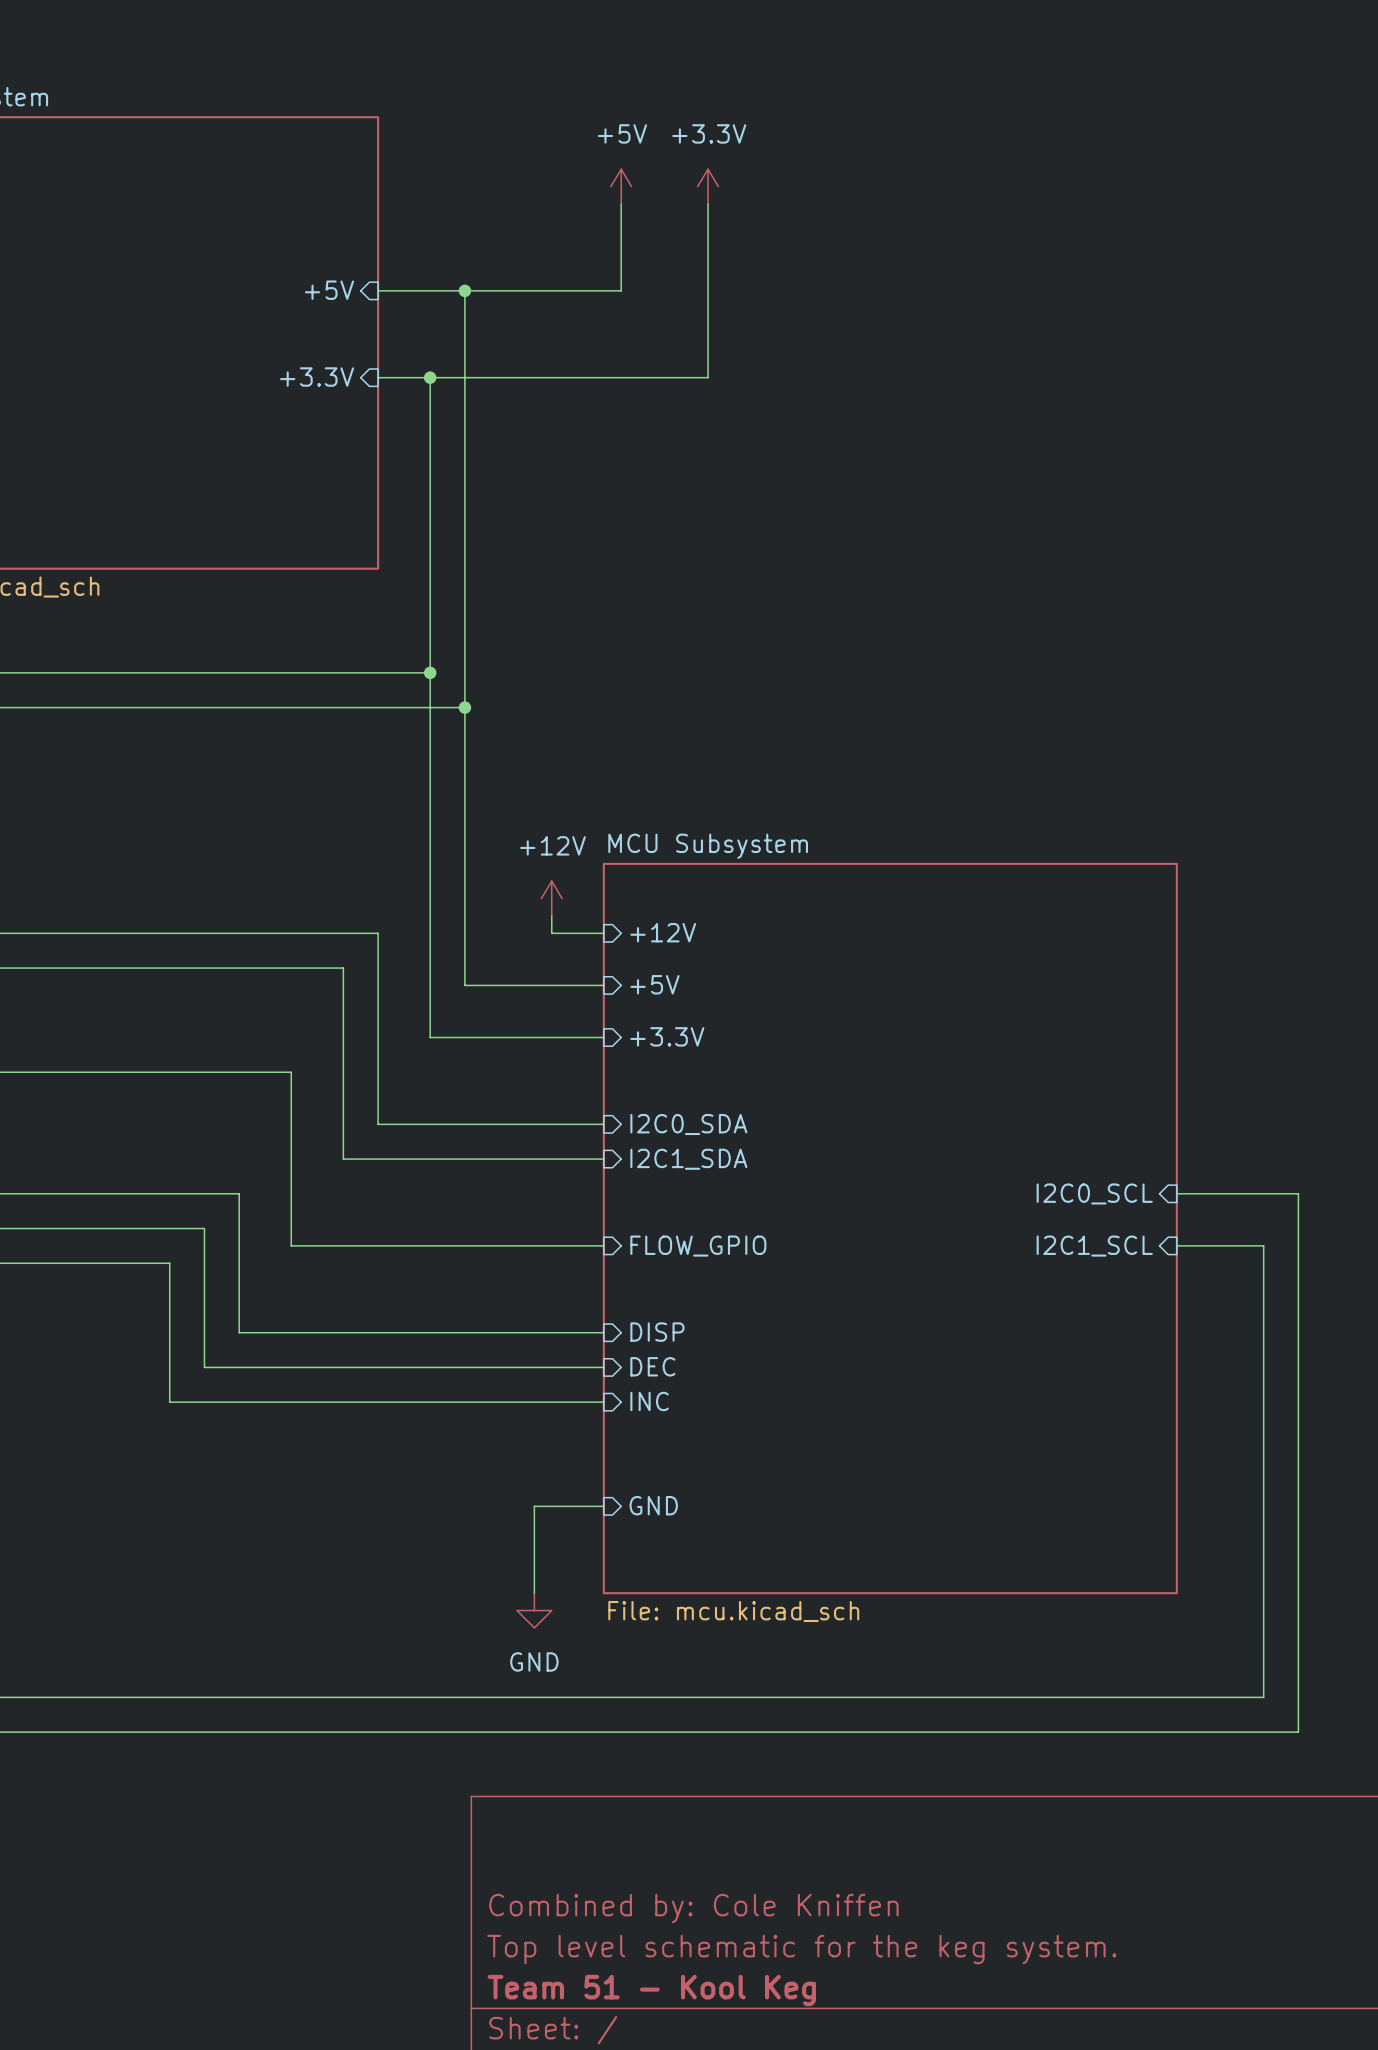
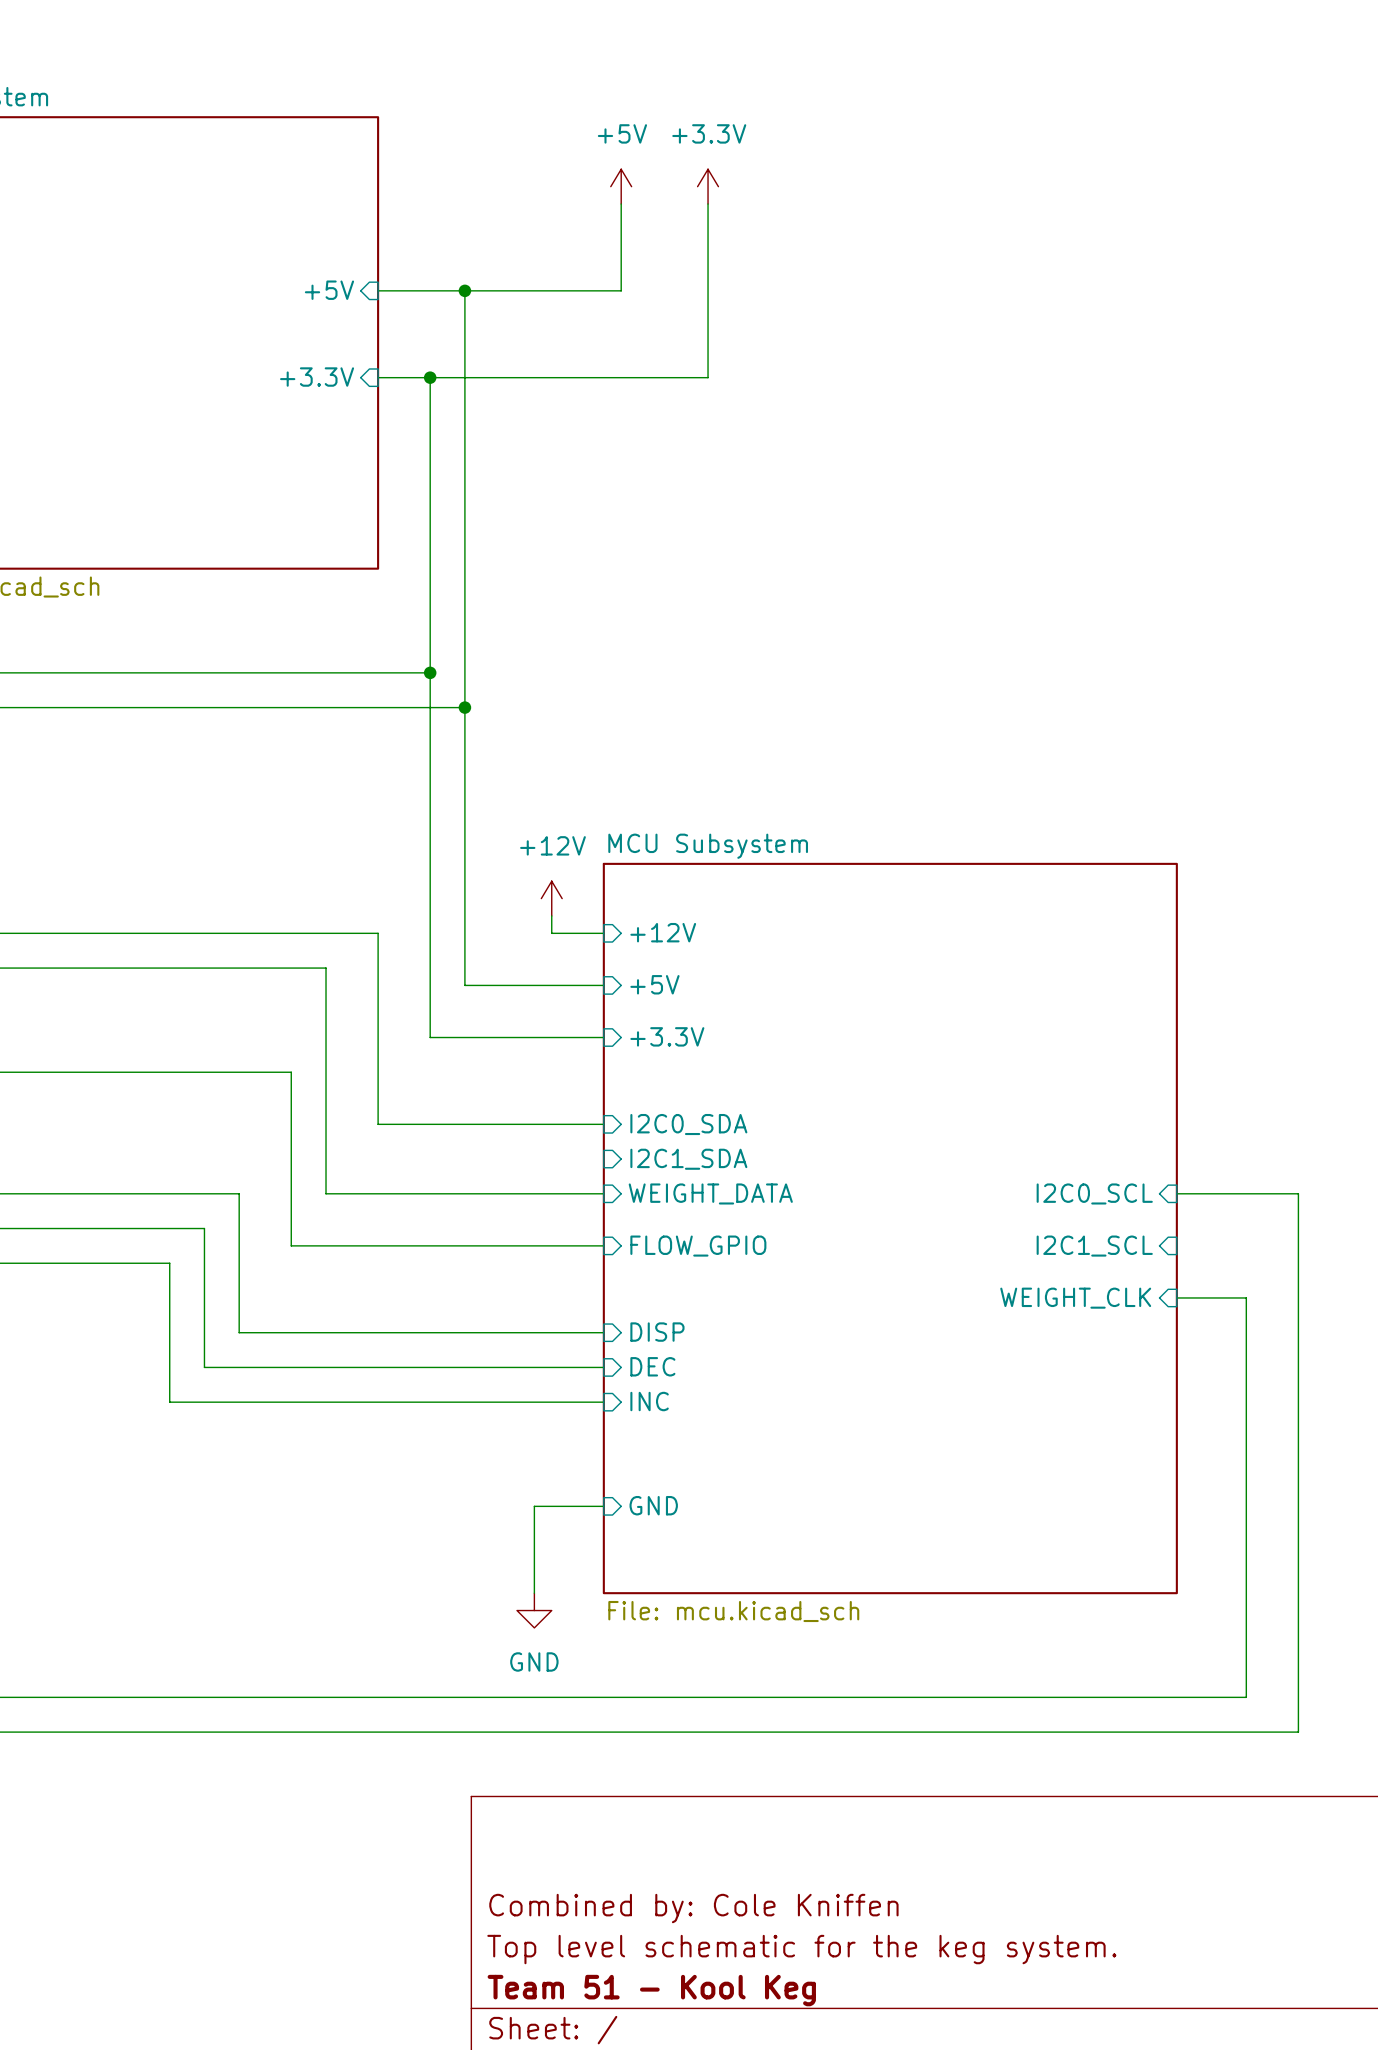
wire: (326, 968) (343, 968) (343, 1159) (603, 1159) -> (326, 968) (326, 1193) (603, 1193)
sheet pin: none -> WEIGHT_DATA (710, 1193)
wire: (1176, 1245) (1263, 1245) (1263, 1697) (1246, 1697) -> (1176, 1297) (1246, 1297) (1246, 1697)
sheet pin: none -> WEIGHT_CLK (1075, 1298)

